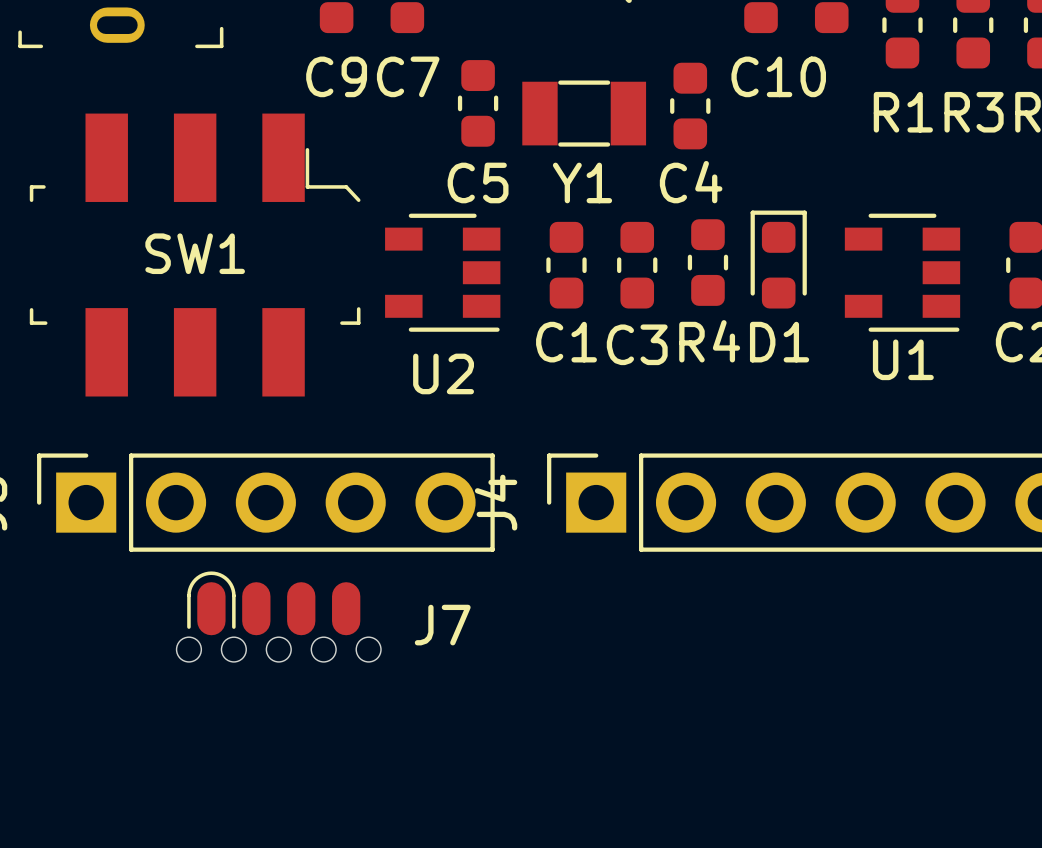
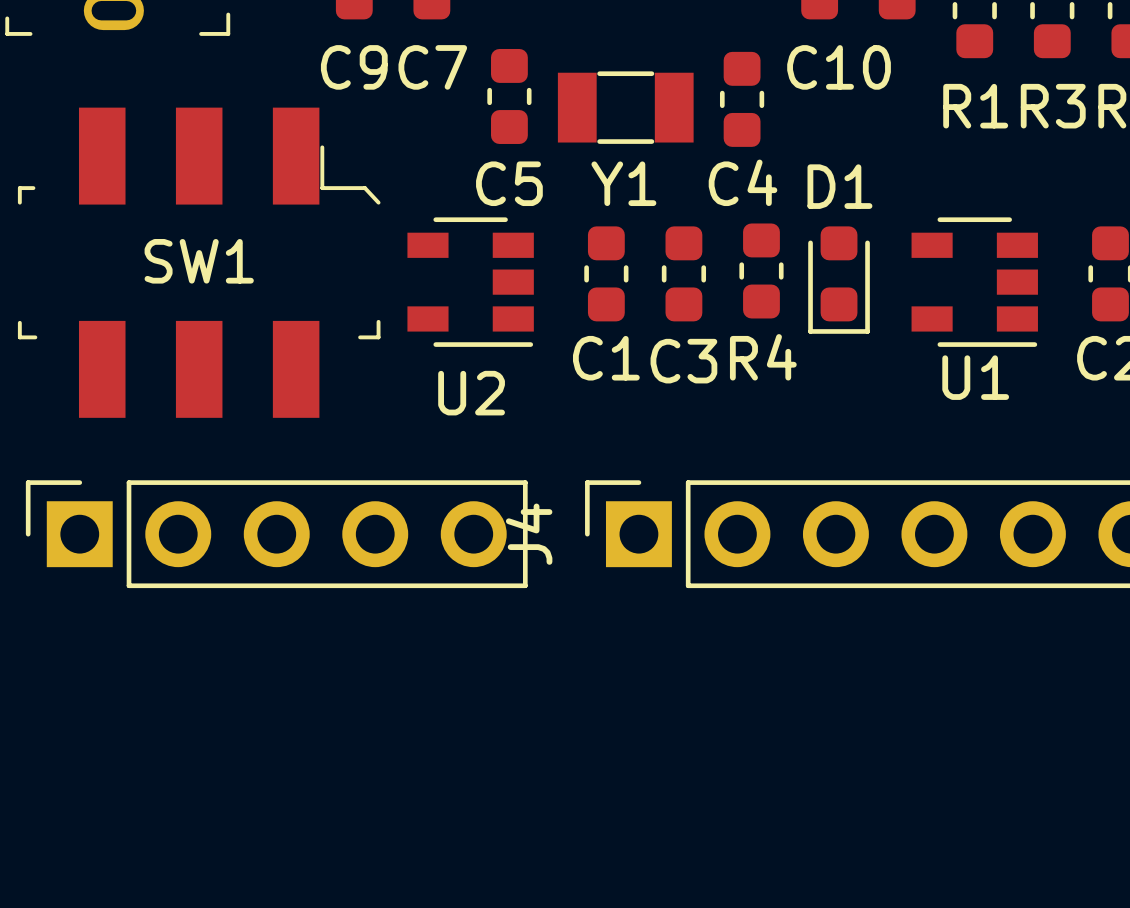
D1 rotation: 0° (778, 259) -> 180° (839, 280)
J7: (278, 616) -> none

